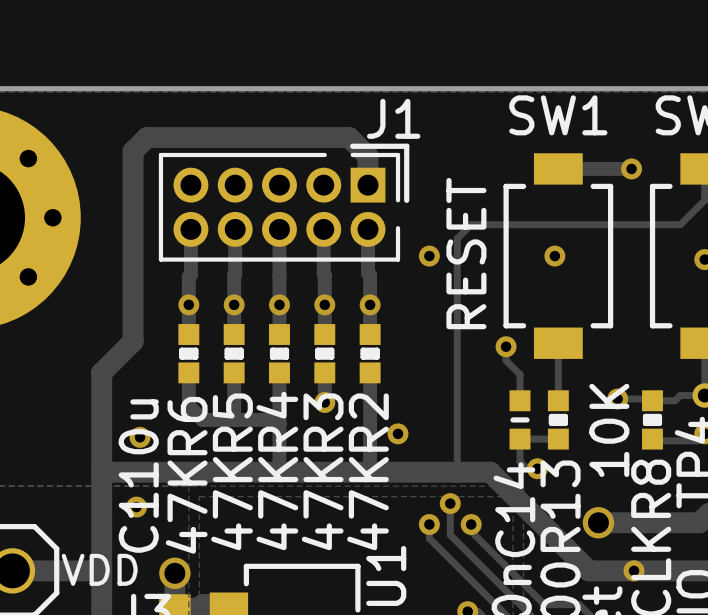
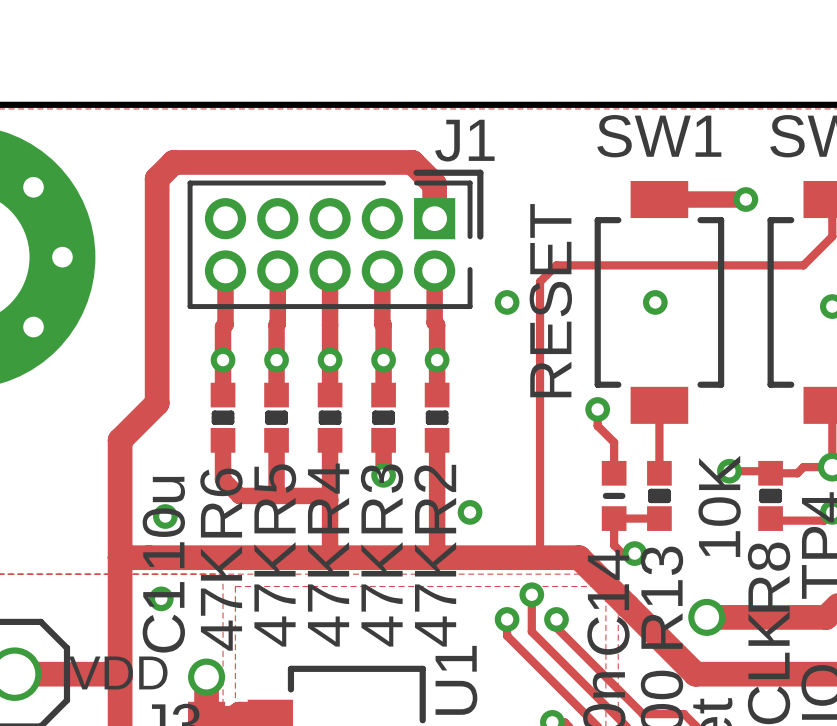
via: (634, 570) -> none

